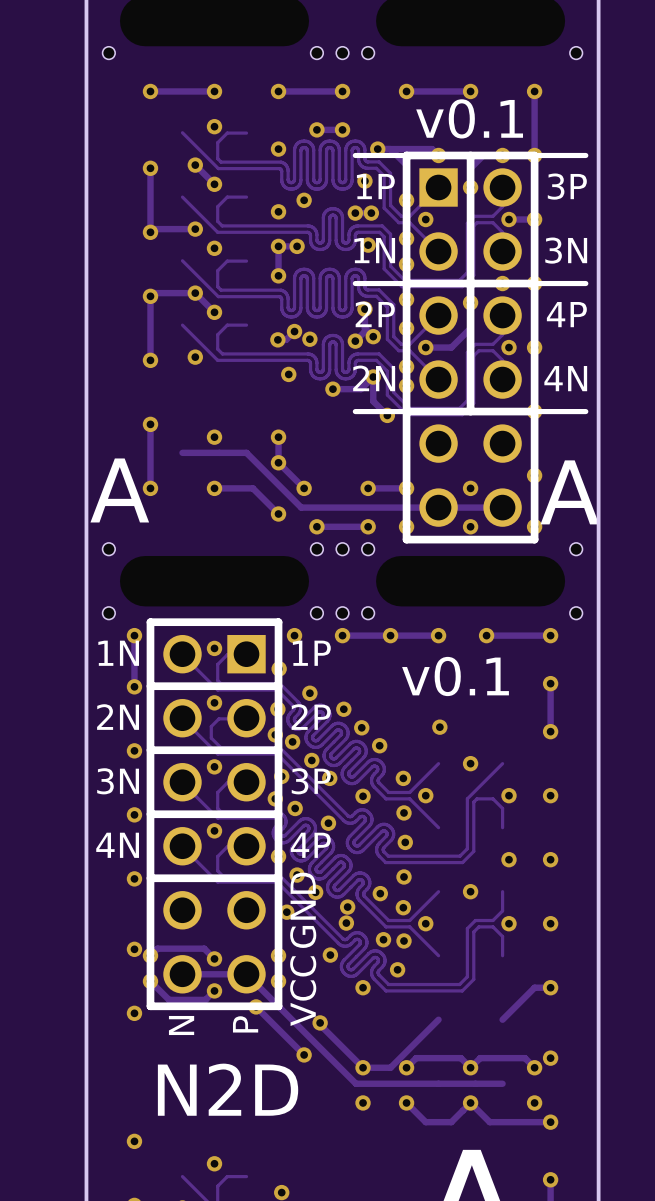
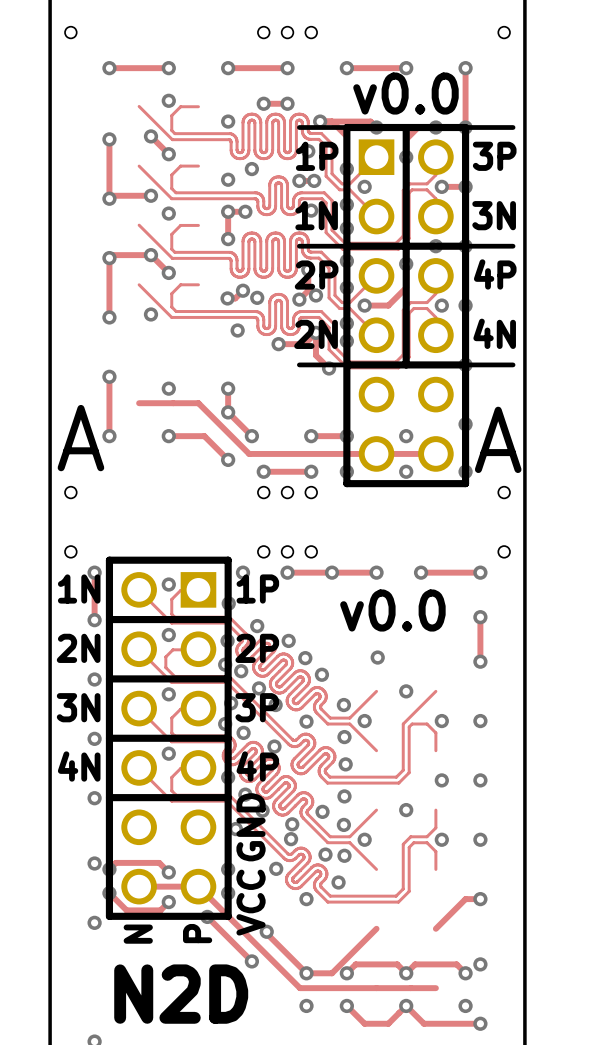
text: v0.1 (469, 118) -> v0.0 (405, 93)
text: v0.1 (455, 676) -> v0.0 (392, 610)

